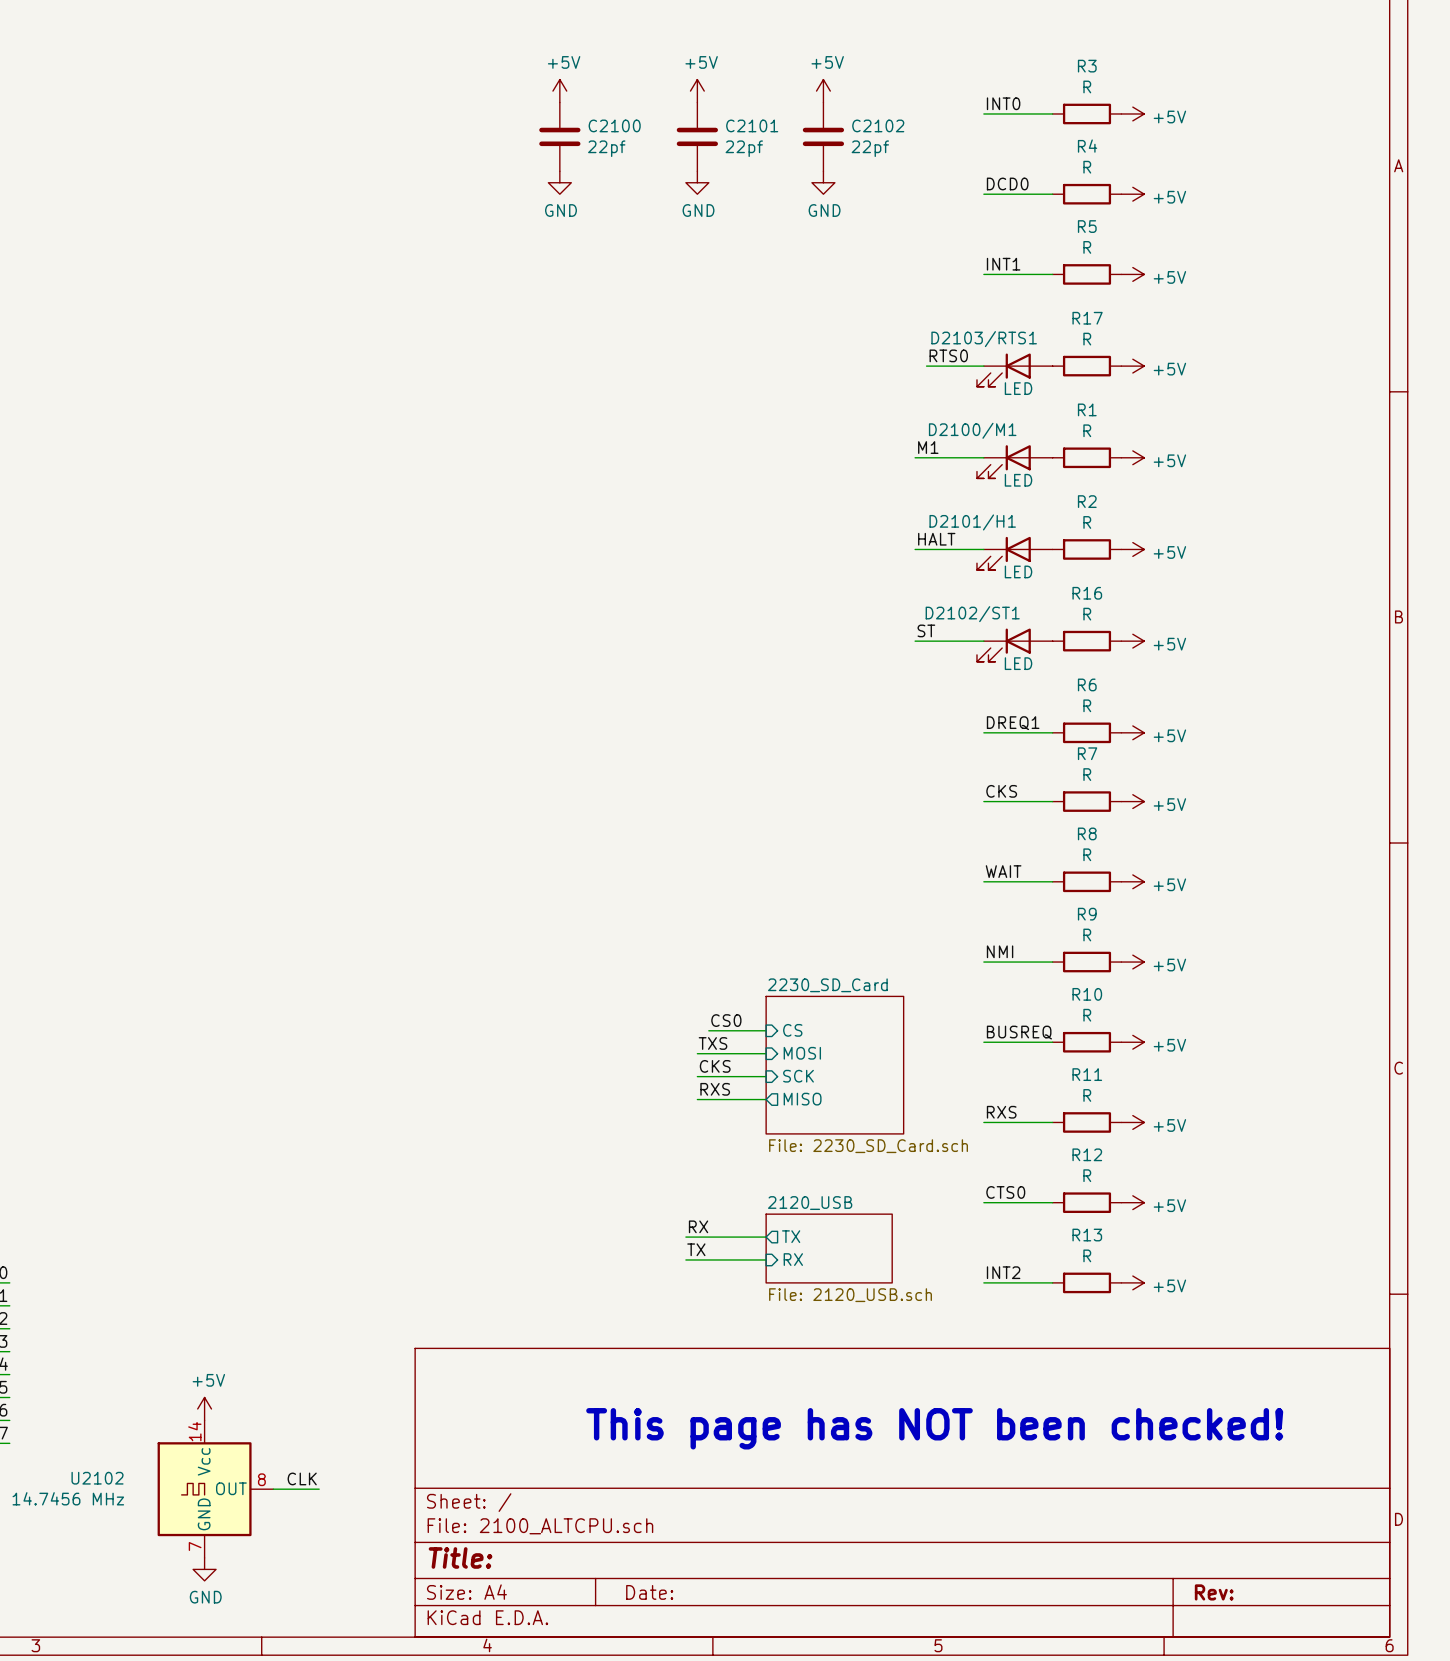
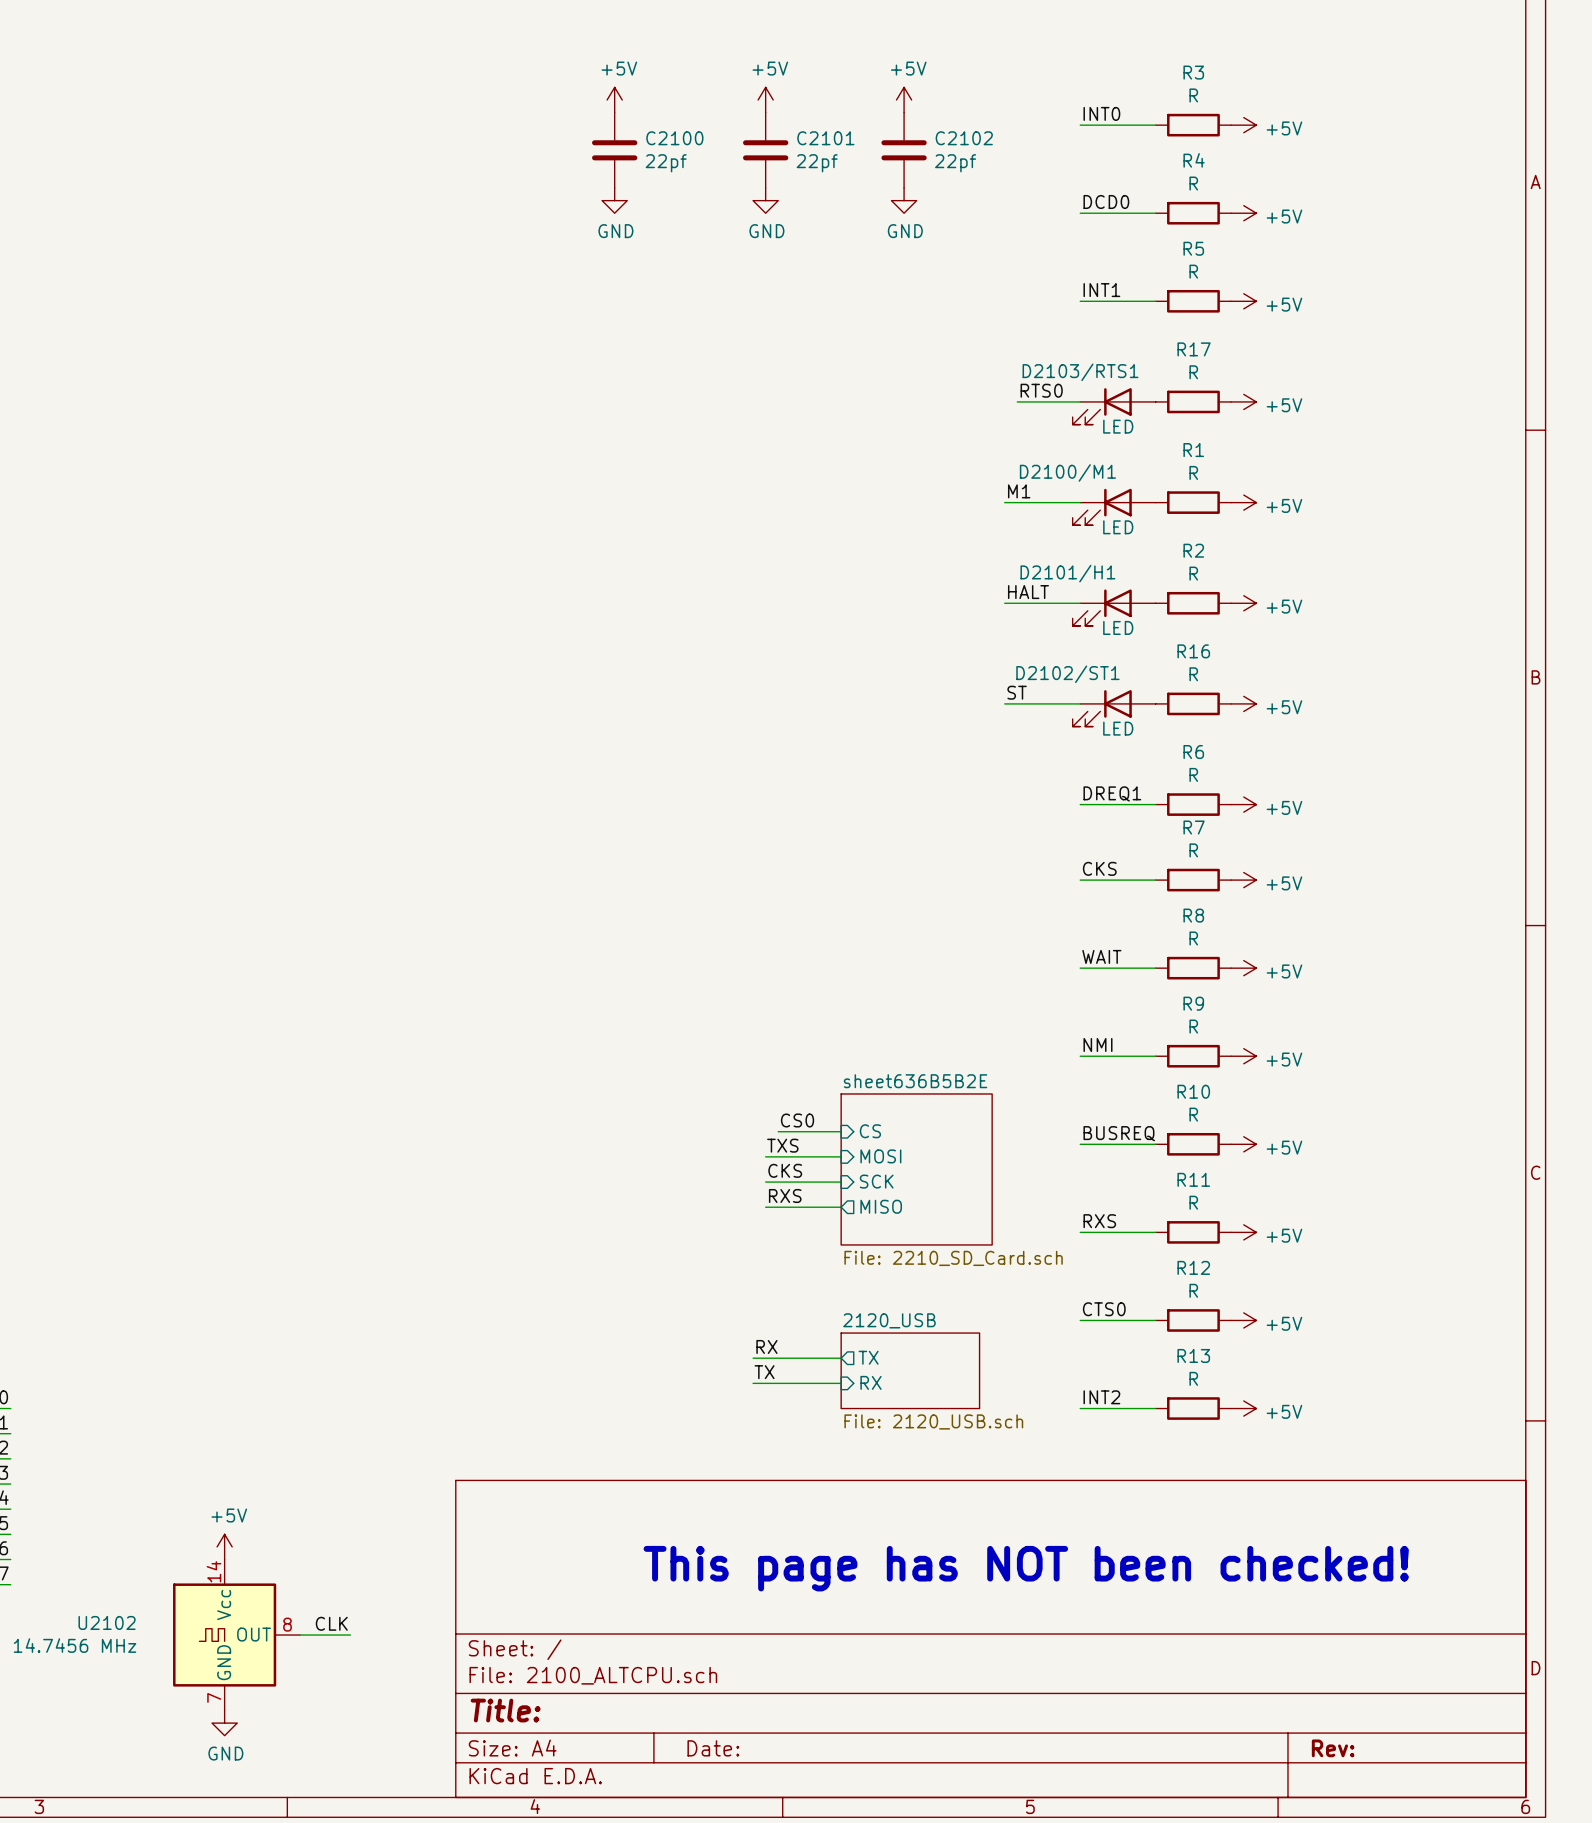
sheet 2230_SD_Card name: 2230_SD_Card (827, 985) -> sheet636B5B2E (915, 1081)
sheet 2230_SD_Card value: File: 2230_SD_Card.sch (868, 1146) -> File: 2210_SD_Card.sch (953, 1258)

